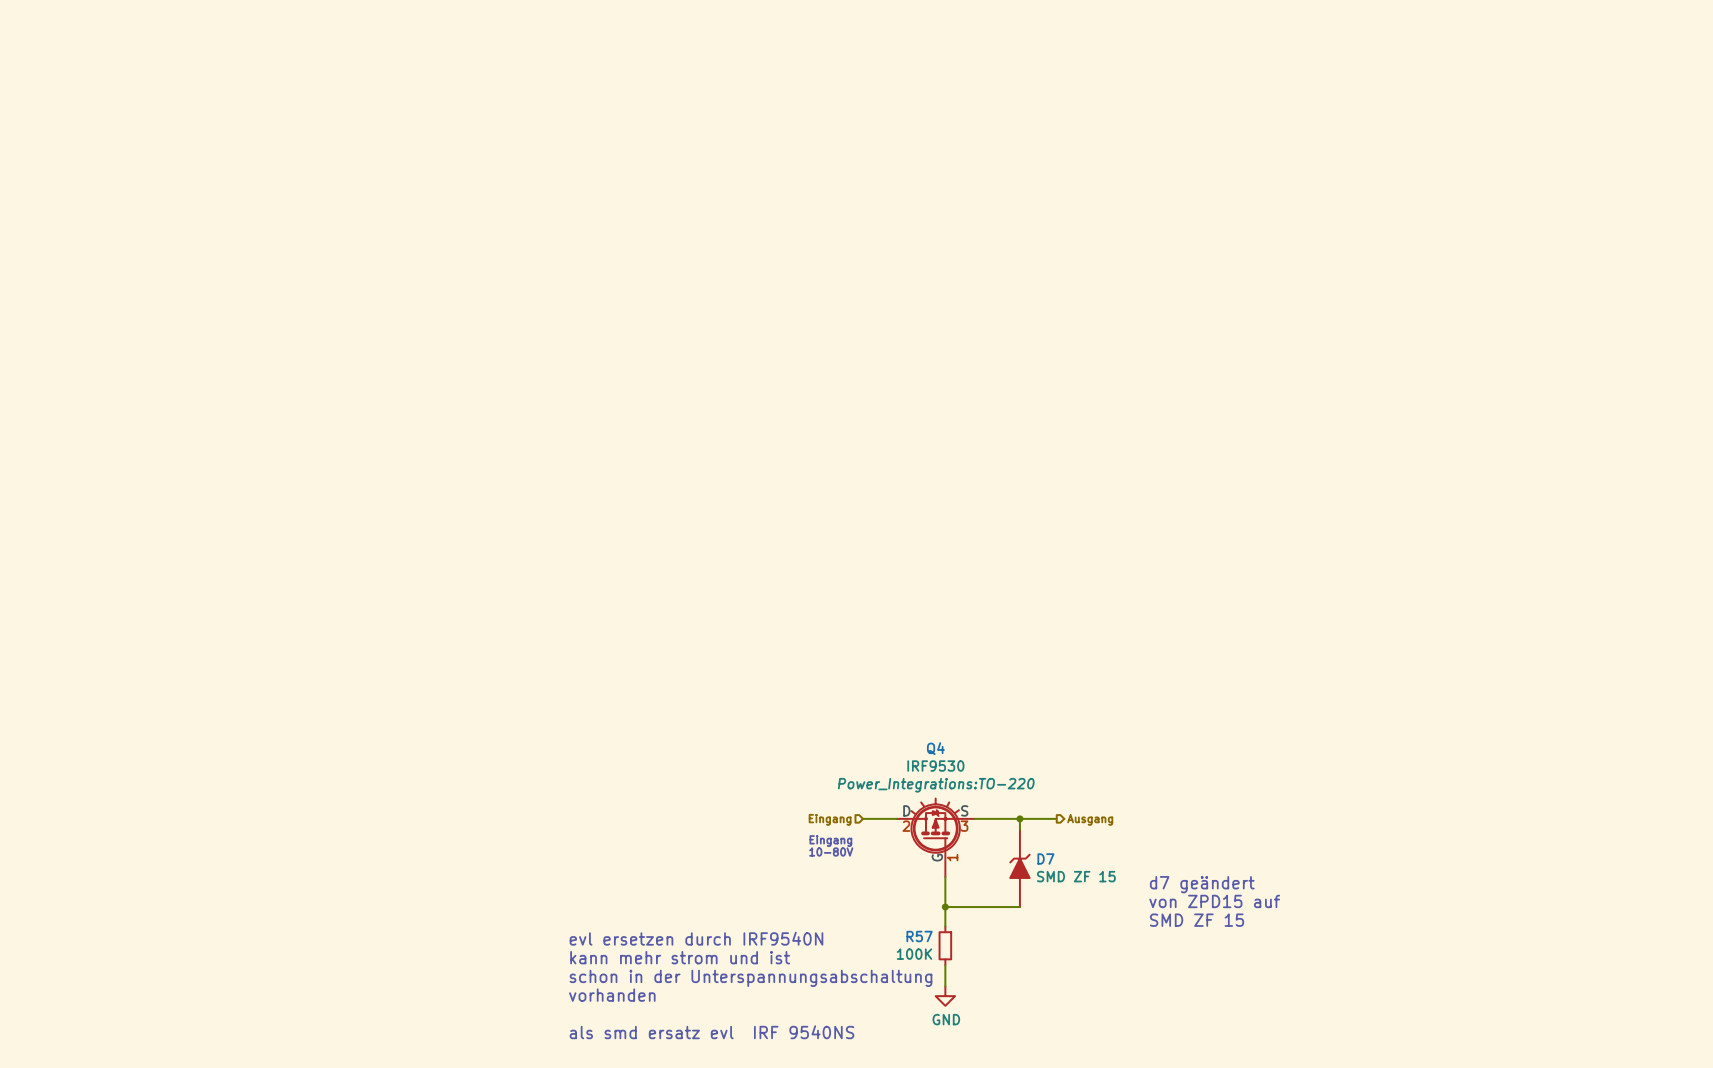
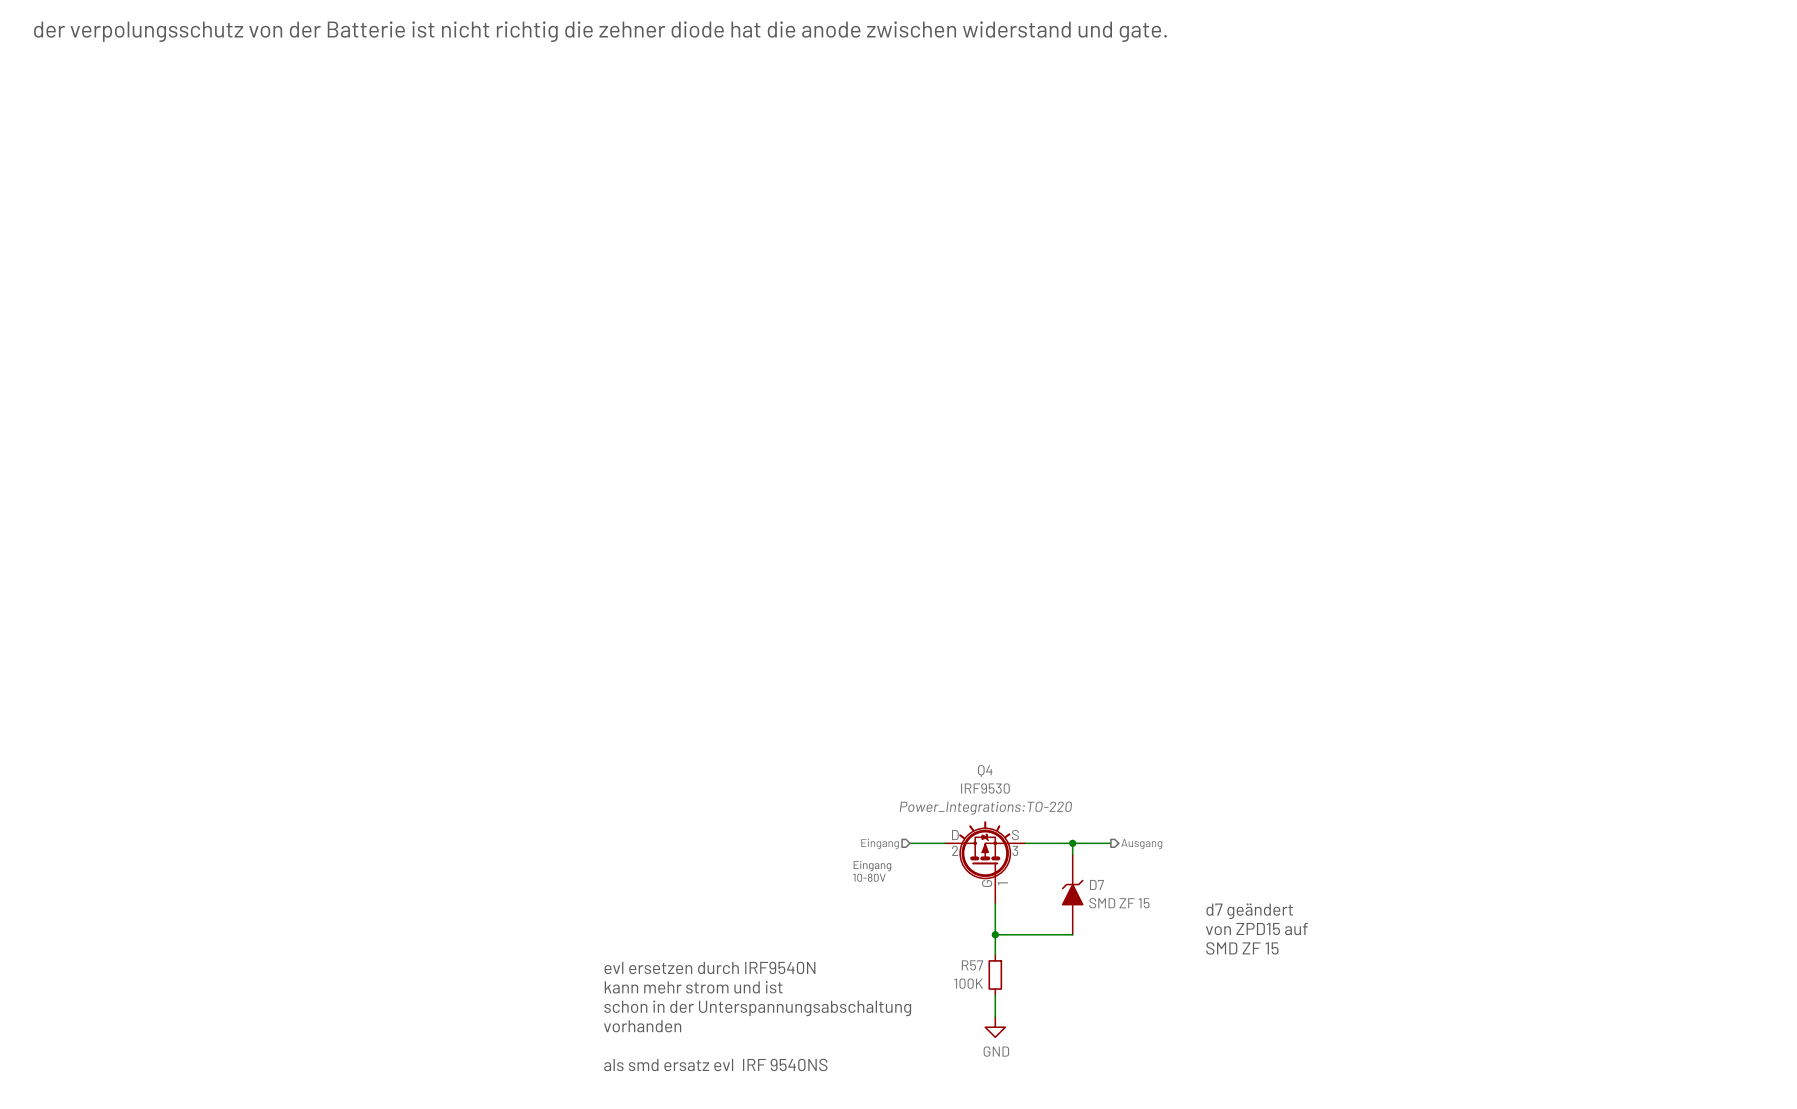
text: none -> der verpolungsschutz von der Batterie ist nicht richtig die zehner diode hat die anode zwischen widerstand und gate. (600, 31)

